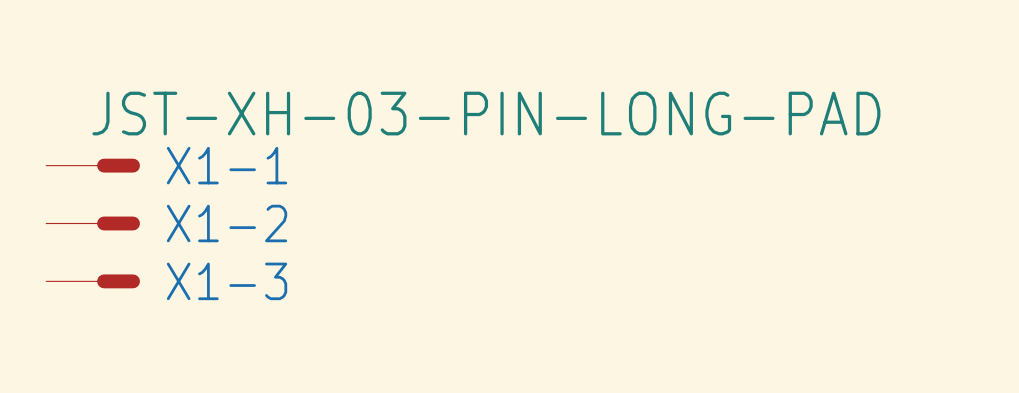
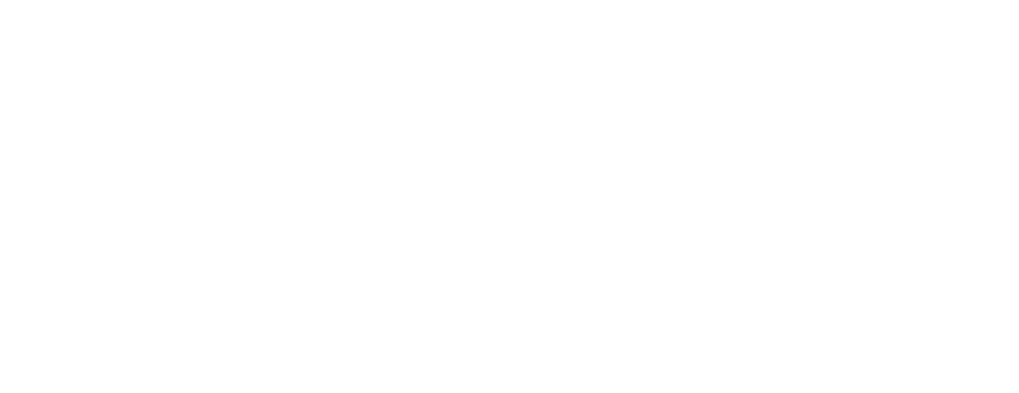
X1-1: JST-XH-03-PIN-LONG-PAD (93, 165) -> none
X1-2: (93, 223) -> none
X1-3: (93, 281) -> none

